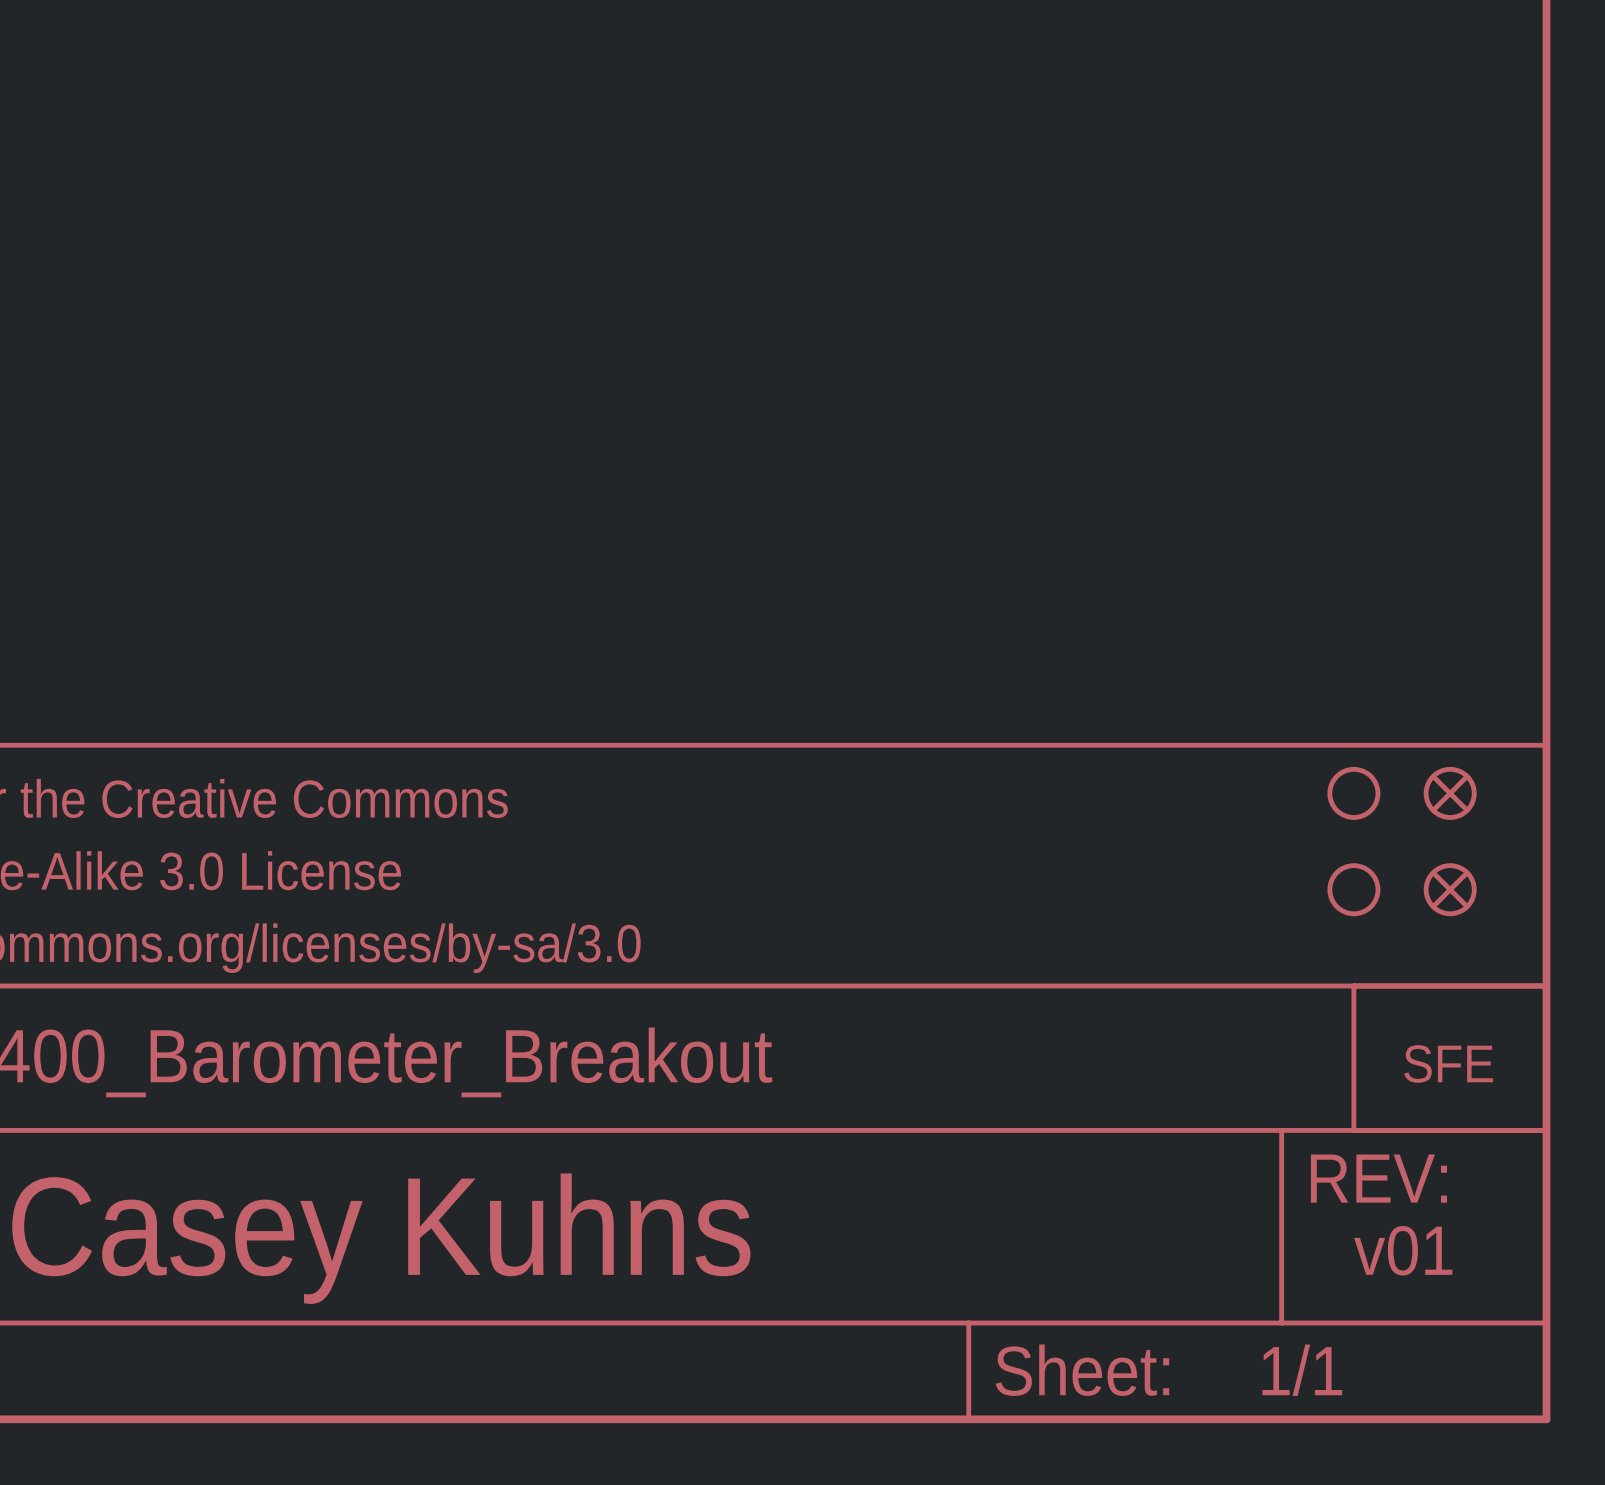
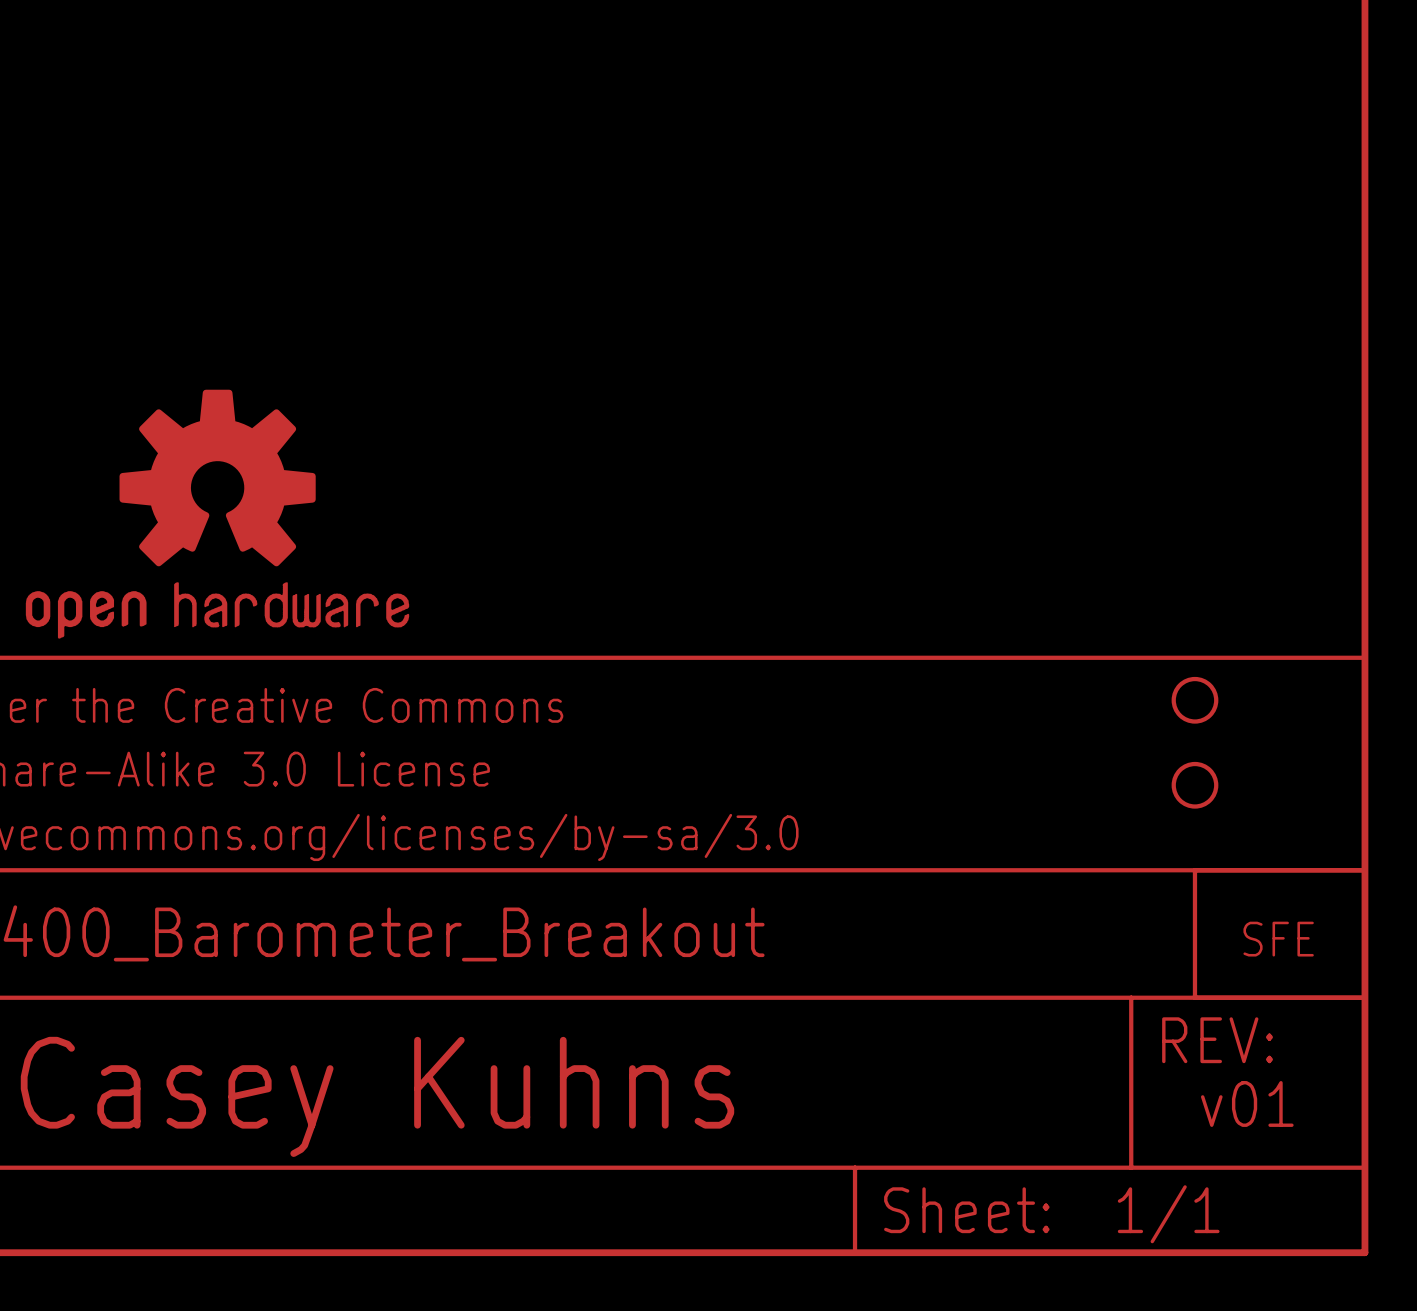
part: none -> (217, 514)
part: (1450, 793) -> none
part: (1450, 889) -> none

